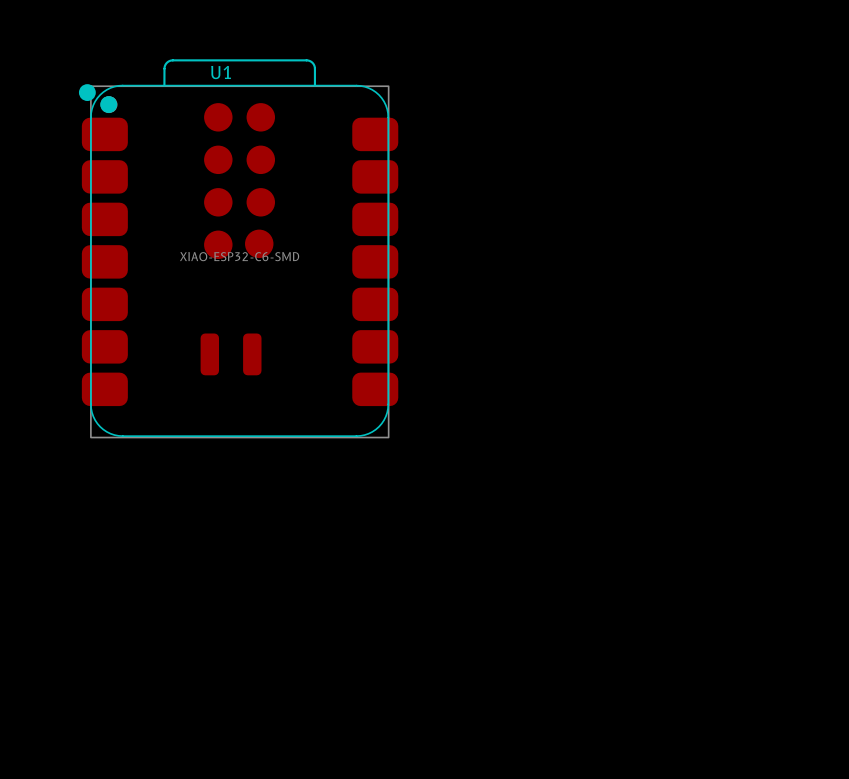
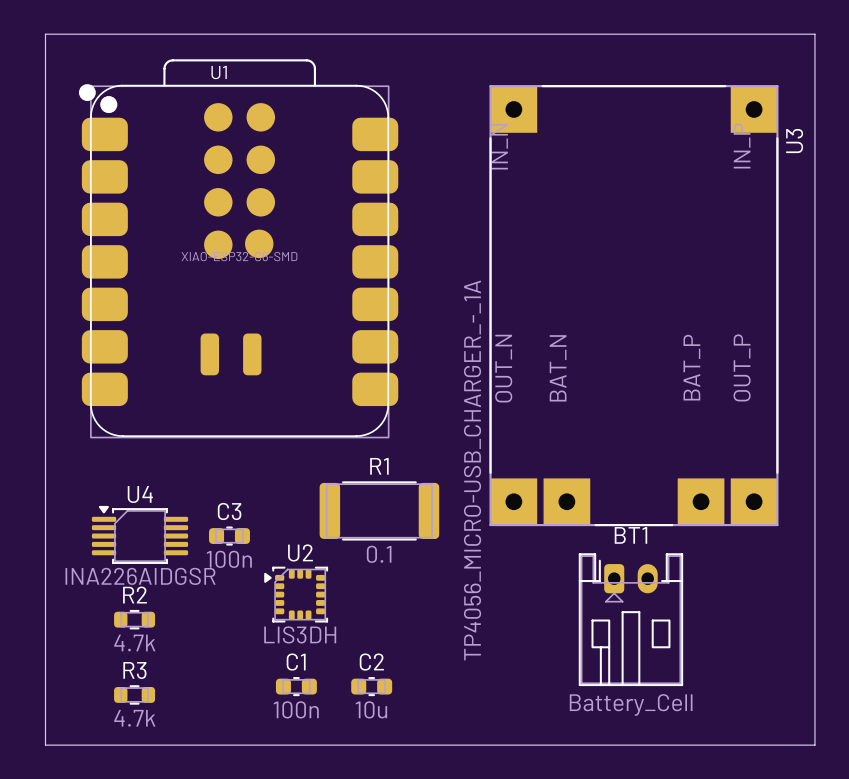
board edge: none -> (45, 34) (814, 34) (814, 745) (45, 745) (45, 34)
U3: none -> TP4056_MICRO-USB_CHARGER_-_1A (633, 305)
R1: none -> 0.1 (379, 510)
U4: none -> INA226AIDGSR (140, 534)
C3: none -> 100n (229, 536)
U2: none -> LIS3DH (296, 594)
R2: none -> 4.7k (134, 619)
BT1: none -> Battery_Cell (630, 619)
C1: none -> 100n (296, 686)
C2: none -> 10u (371, 686)
R3: none -> 4.7k (134, 694)

